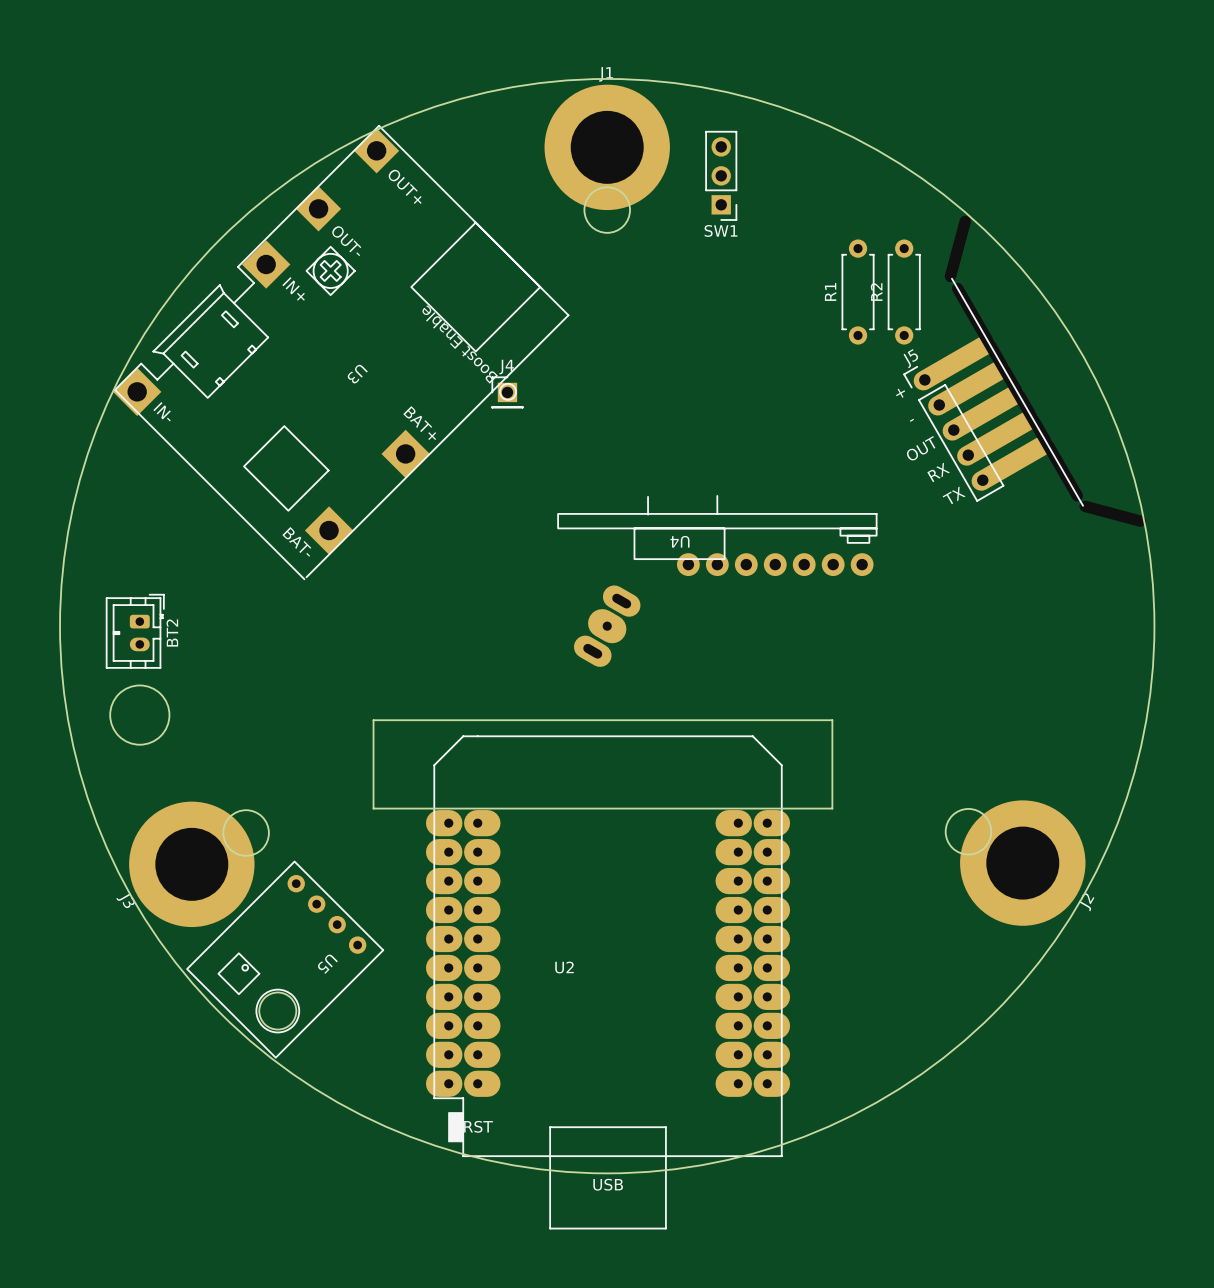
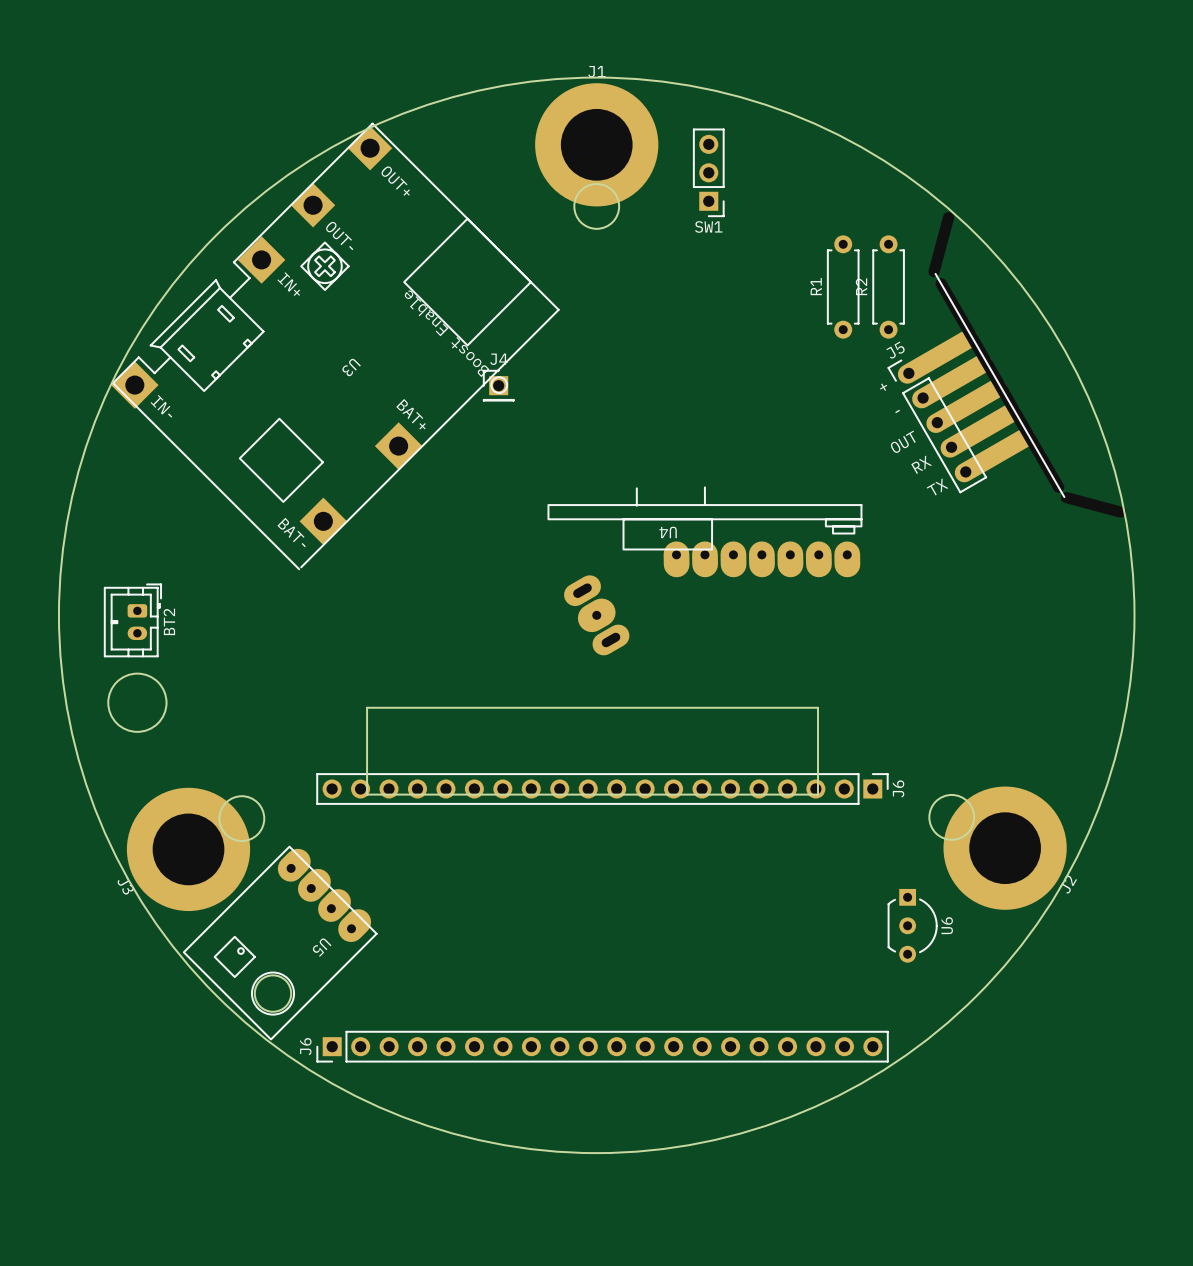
U4 footprint: [557, 495, 878, 577] -> [547, 486, 863, 578]
part rotation: 0° (607, 626) -> 60° counterclockwise (596, 615)
J6: none -> (602, 789)
U5 footprint: [186, 860, 384, 1059] -> [183, 845, 378, 1041]
U6: none -> (912, 925)
U2: (608, 982) -> none
J6: none -> (602, 1046)

